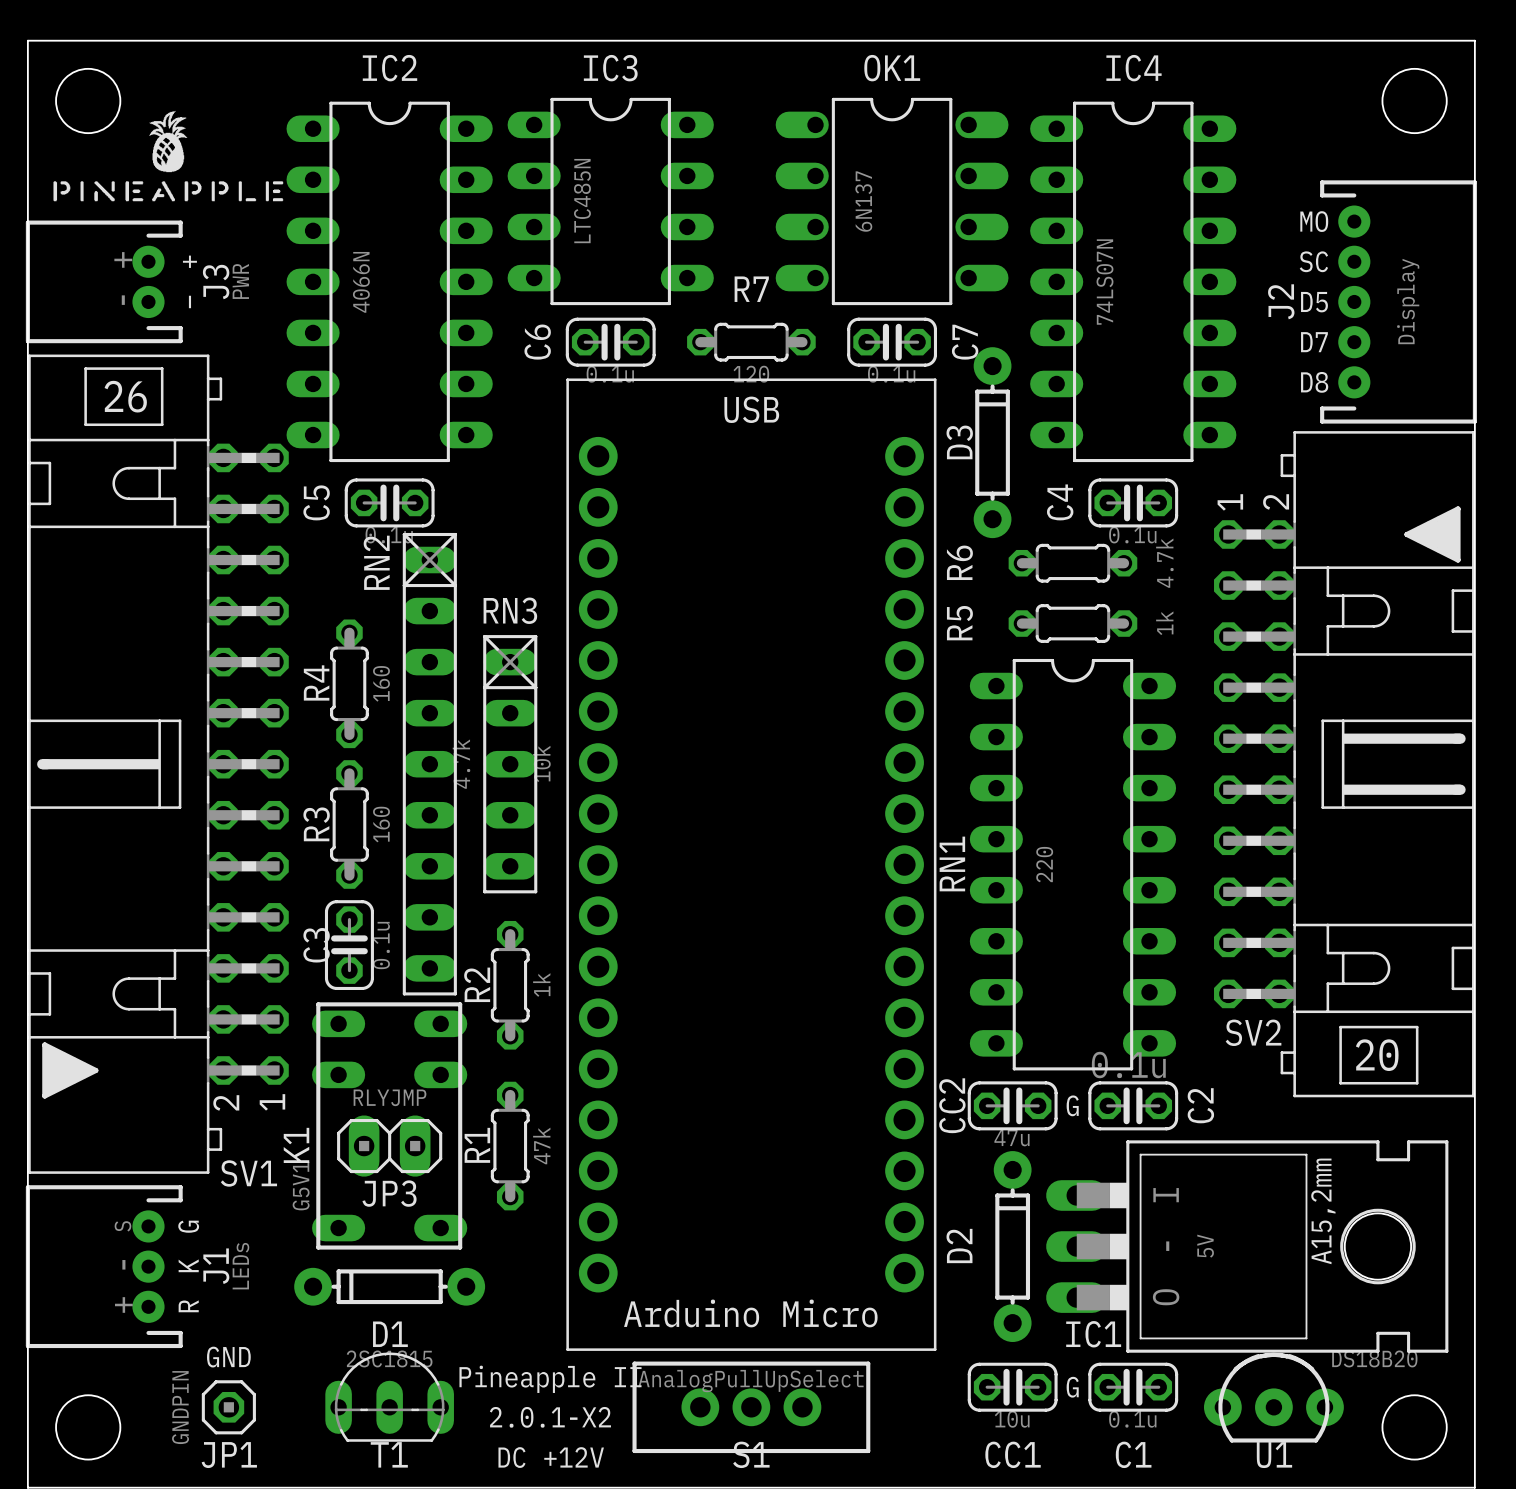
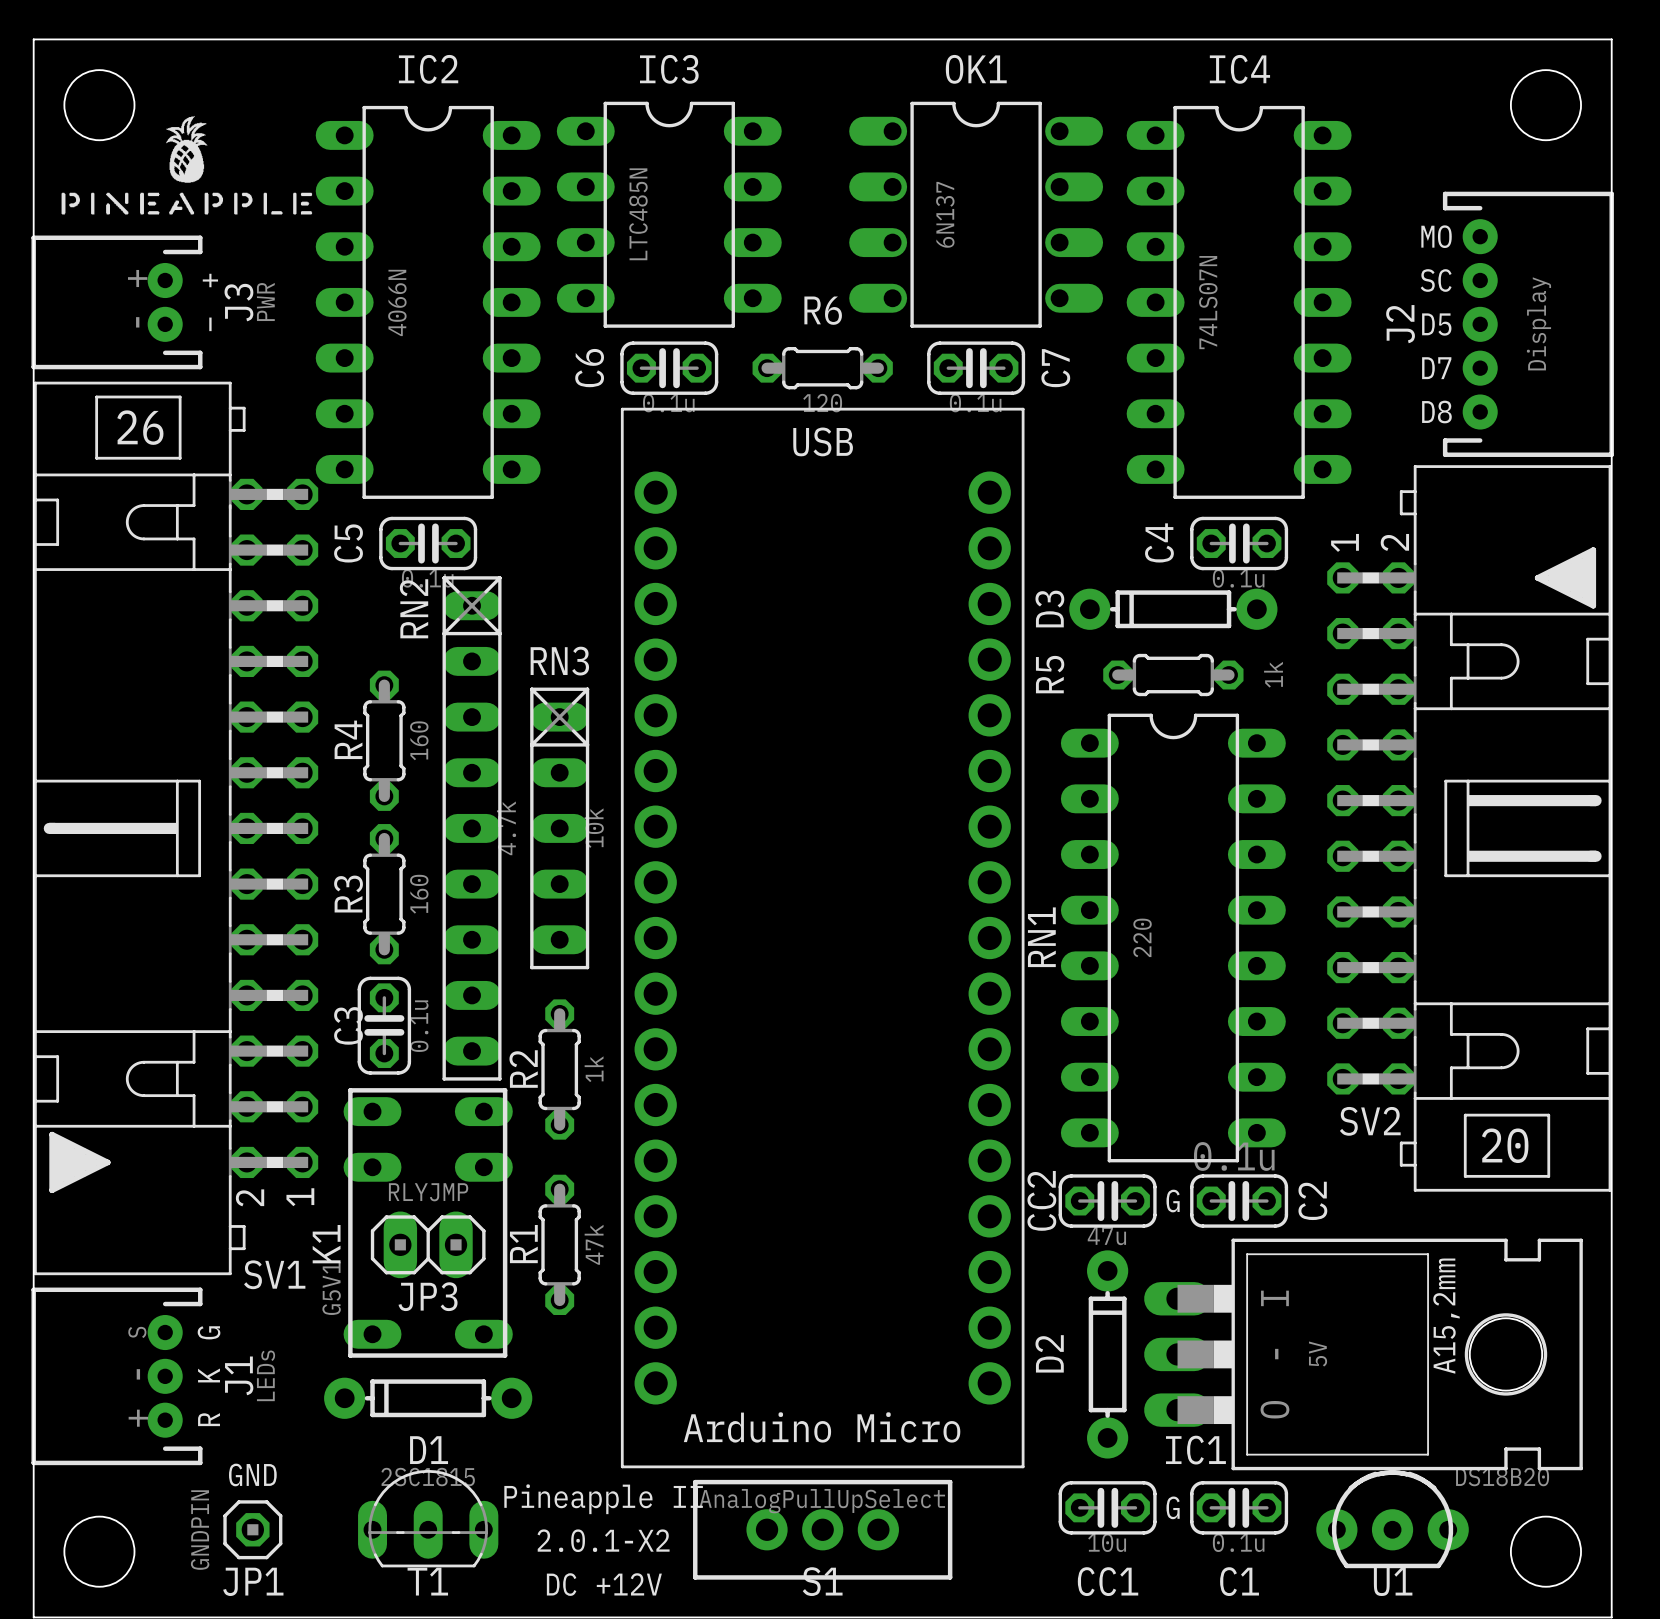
R7 name: R7 (751, 289) -> R6 (823, 310)
D3 name position: D3 (959, 442) -> D3 (1049, 609)
D3 rotation: 0° (992, 442) -> 90° counterclockwise (1173, 609)
D3 position: (992, 442) -> (1173, 609)
R6: 4.7k (1072, 563) -> none

